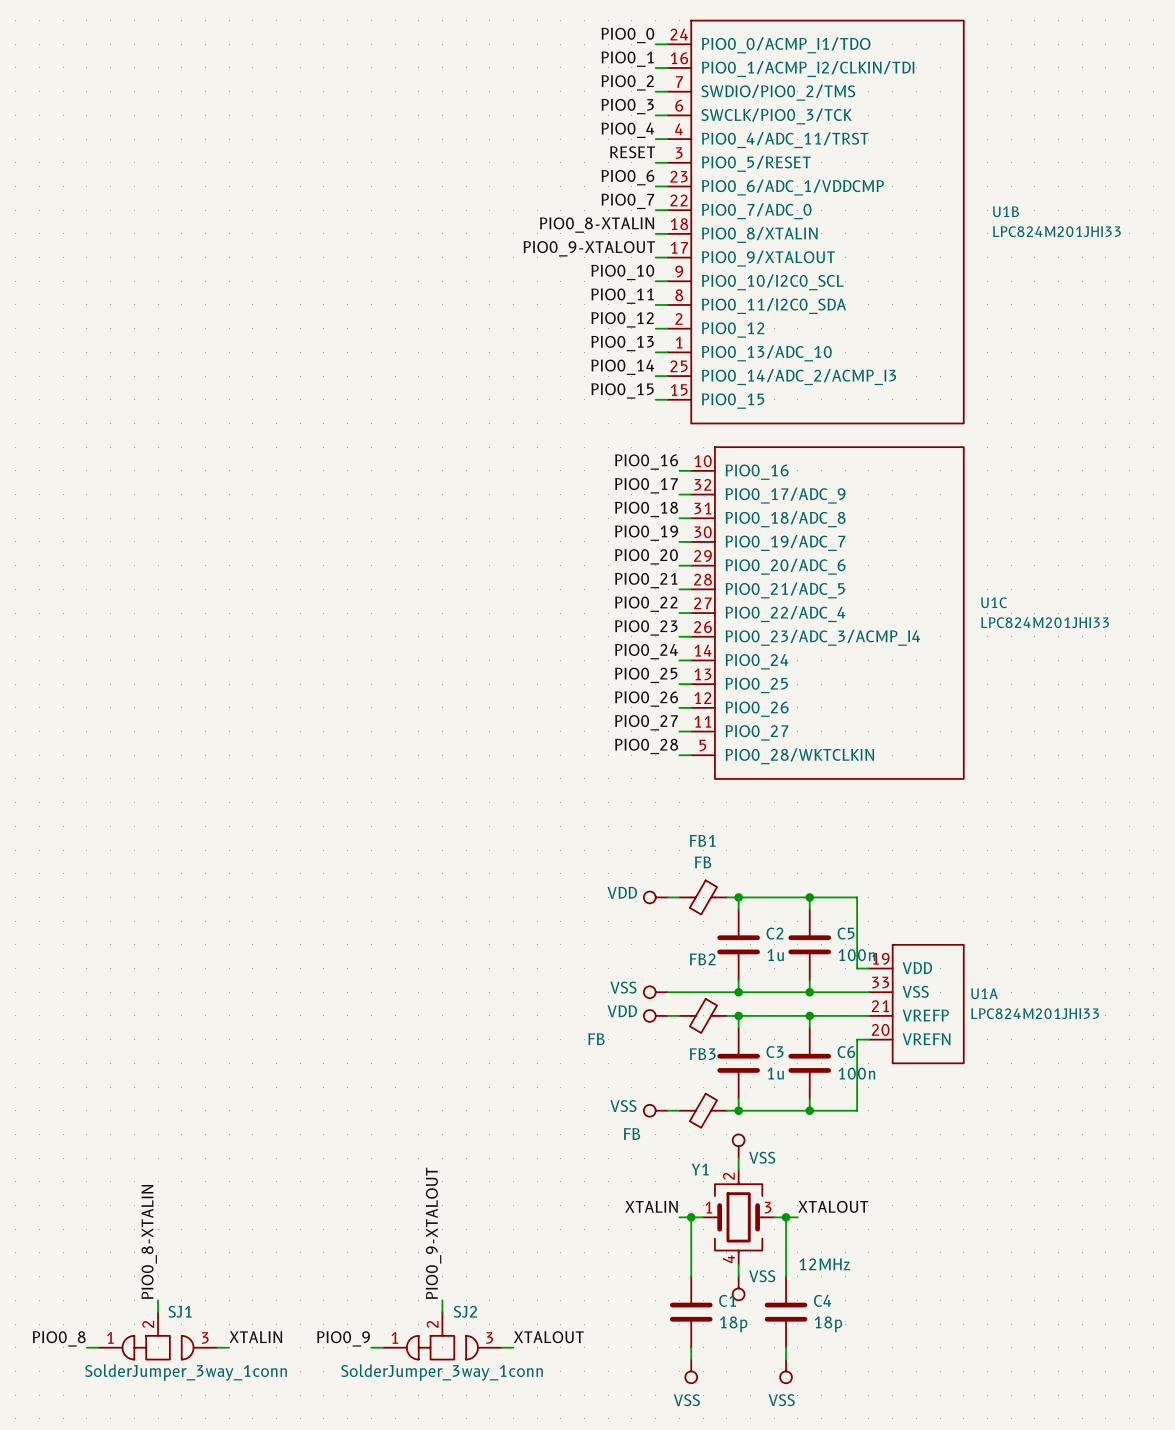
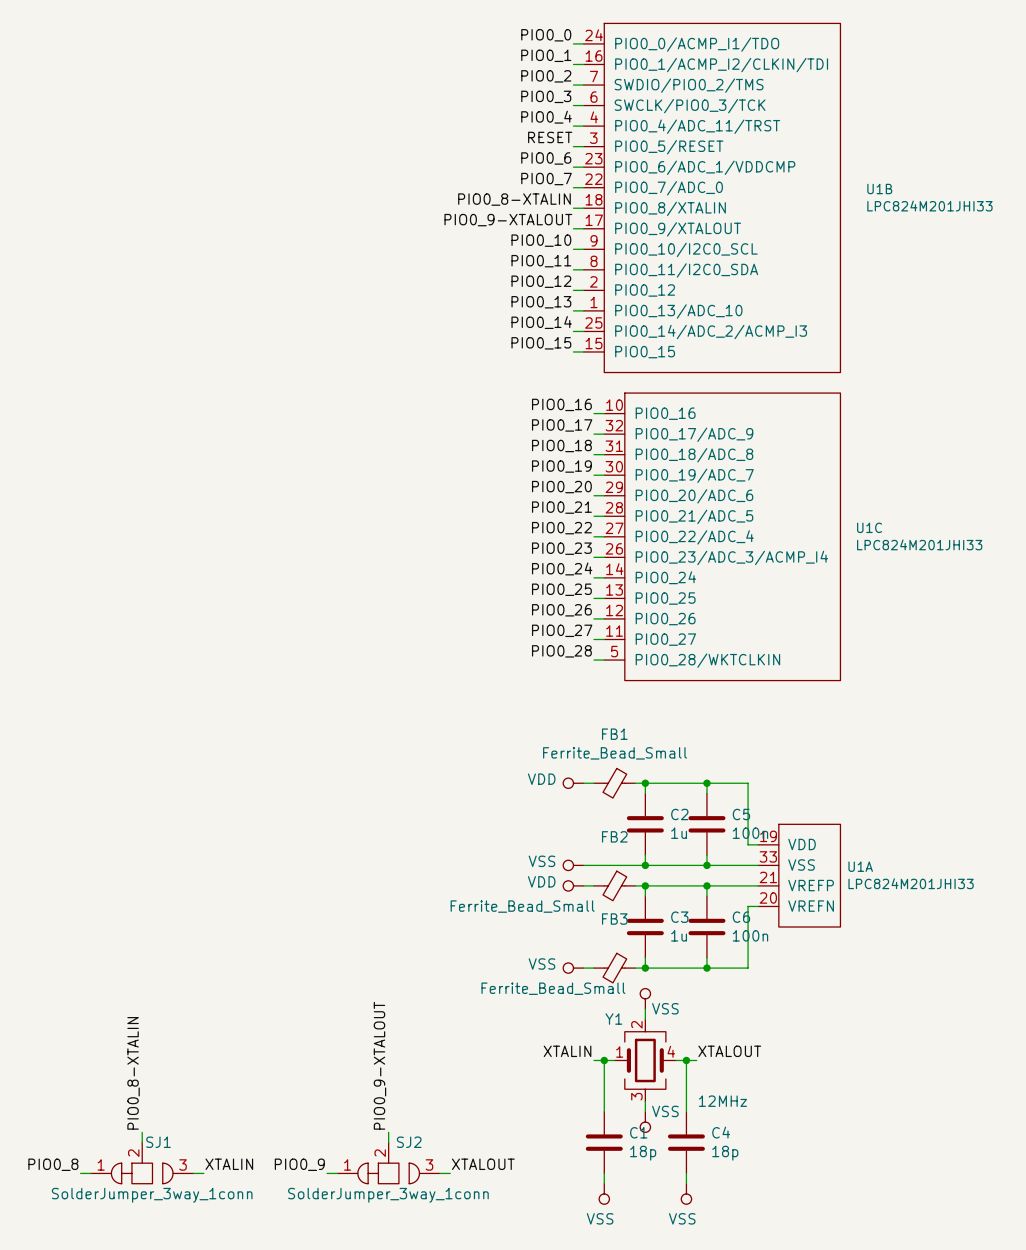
FB1 value: FB (703, 862) -> Ferrite_Bead_Small (615, 753)
FB2 value: FB (596, 1039) -> Ferrite_Bead_Small (522, 906)
FB3 value: FB (631, 1134) -> Ferrite_Bead_Small (553, 988)
Y1 pin number: 3 (768, 1207) -> 4 (671, 1051)
Y1 pin number: 4 (728, 1259) -> 3 (636, 1096)

